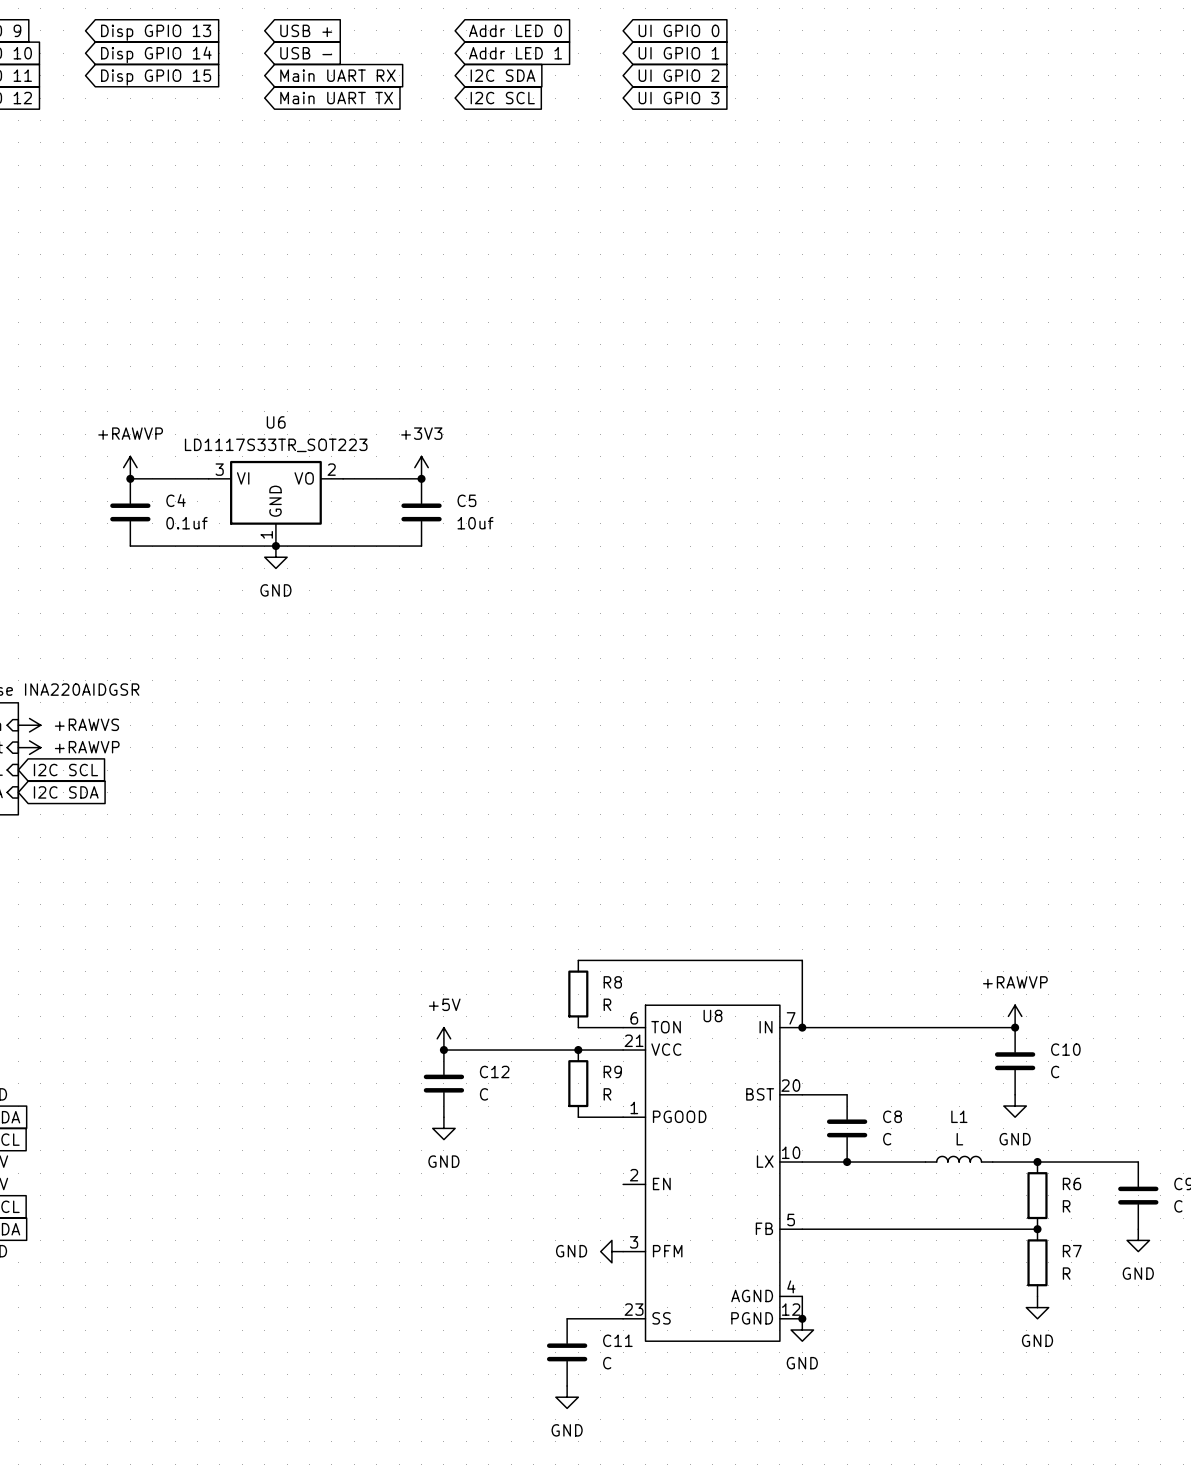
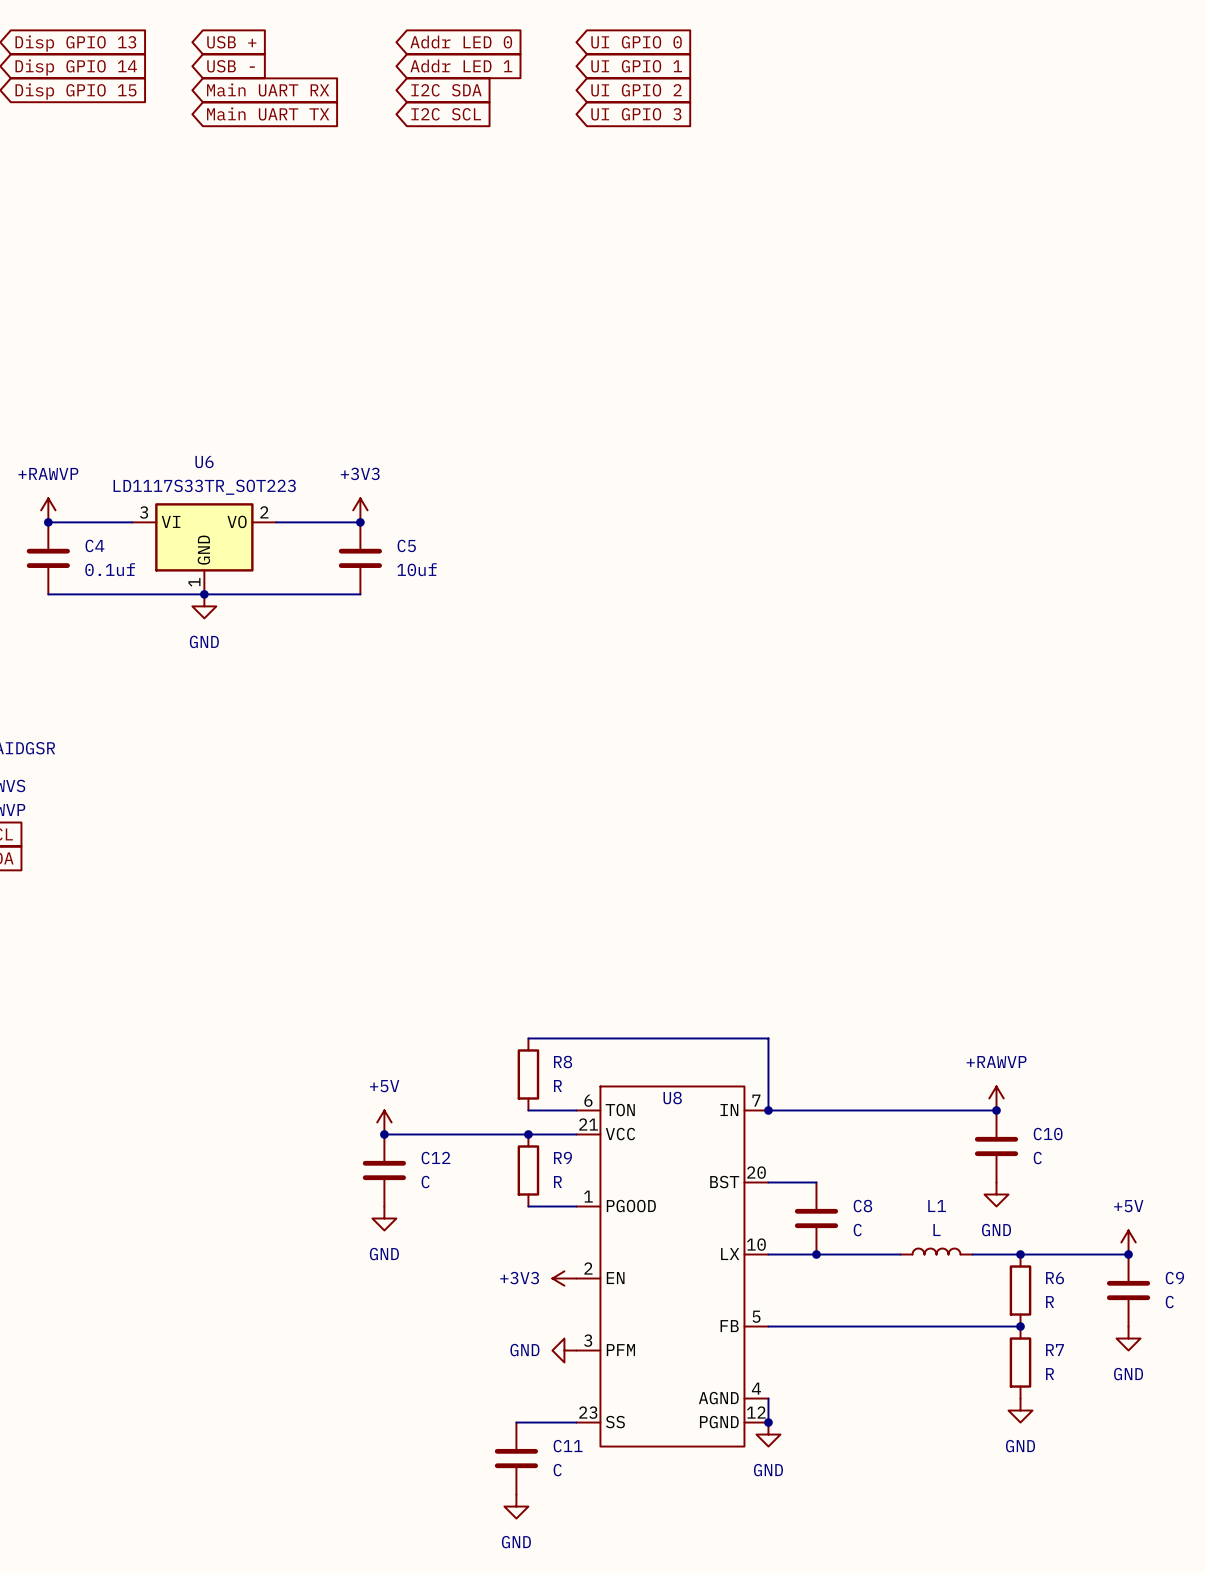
power symbol: none -> +5V (1128, 1242)
junction: none -> (1128, 1254)
power symbol: none -> +3V3 (564, 1278)

